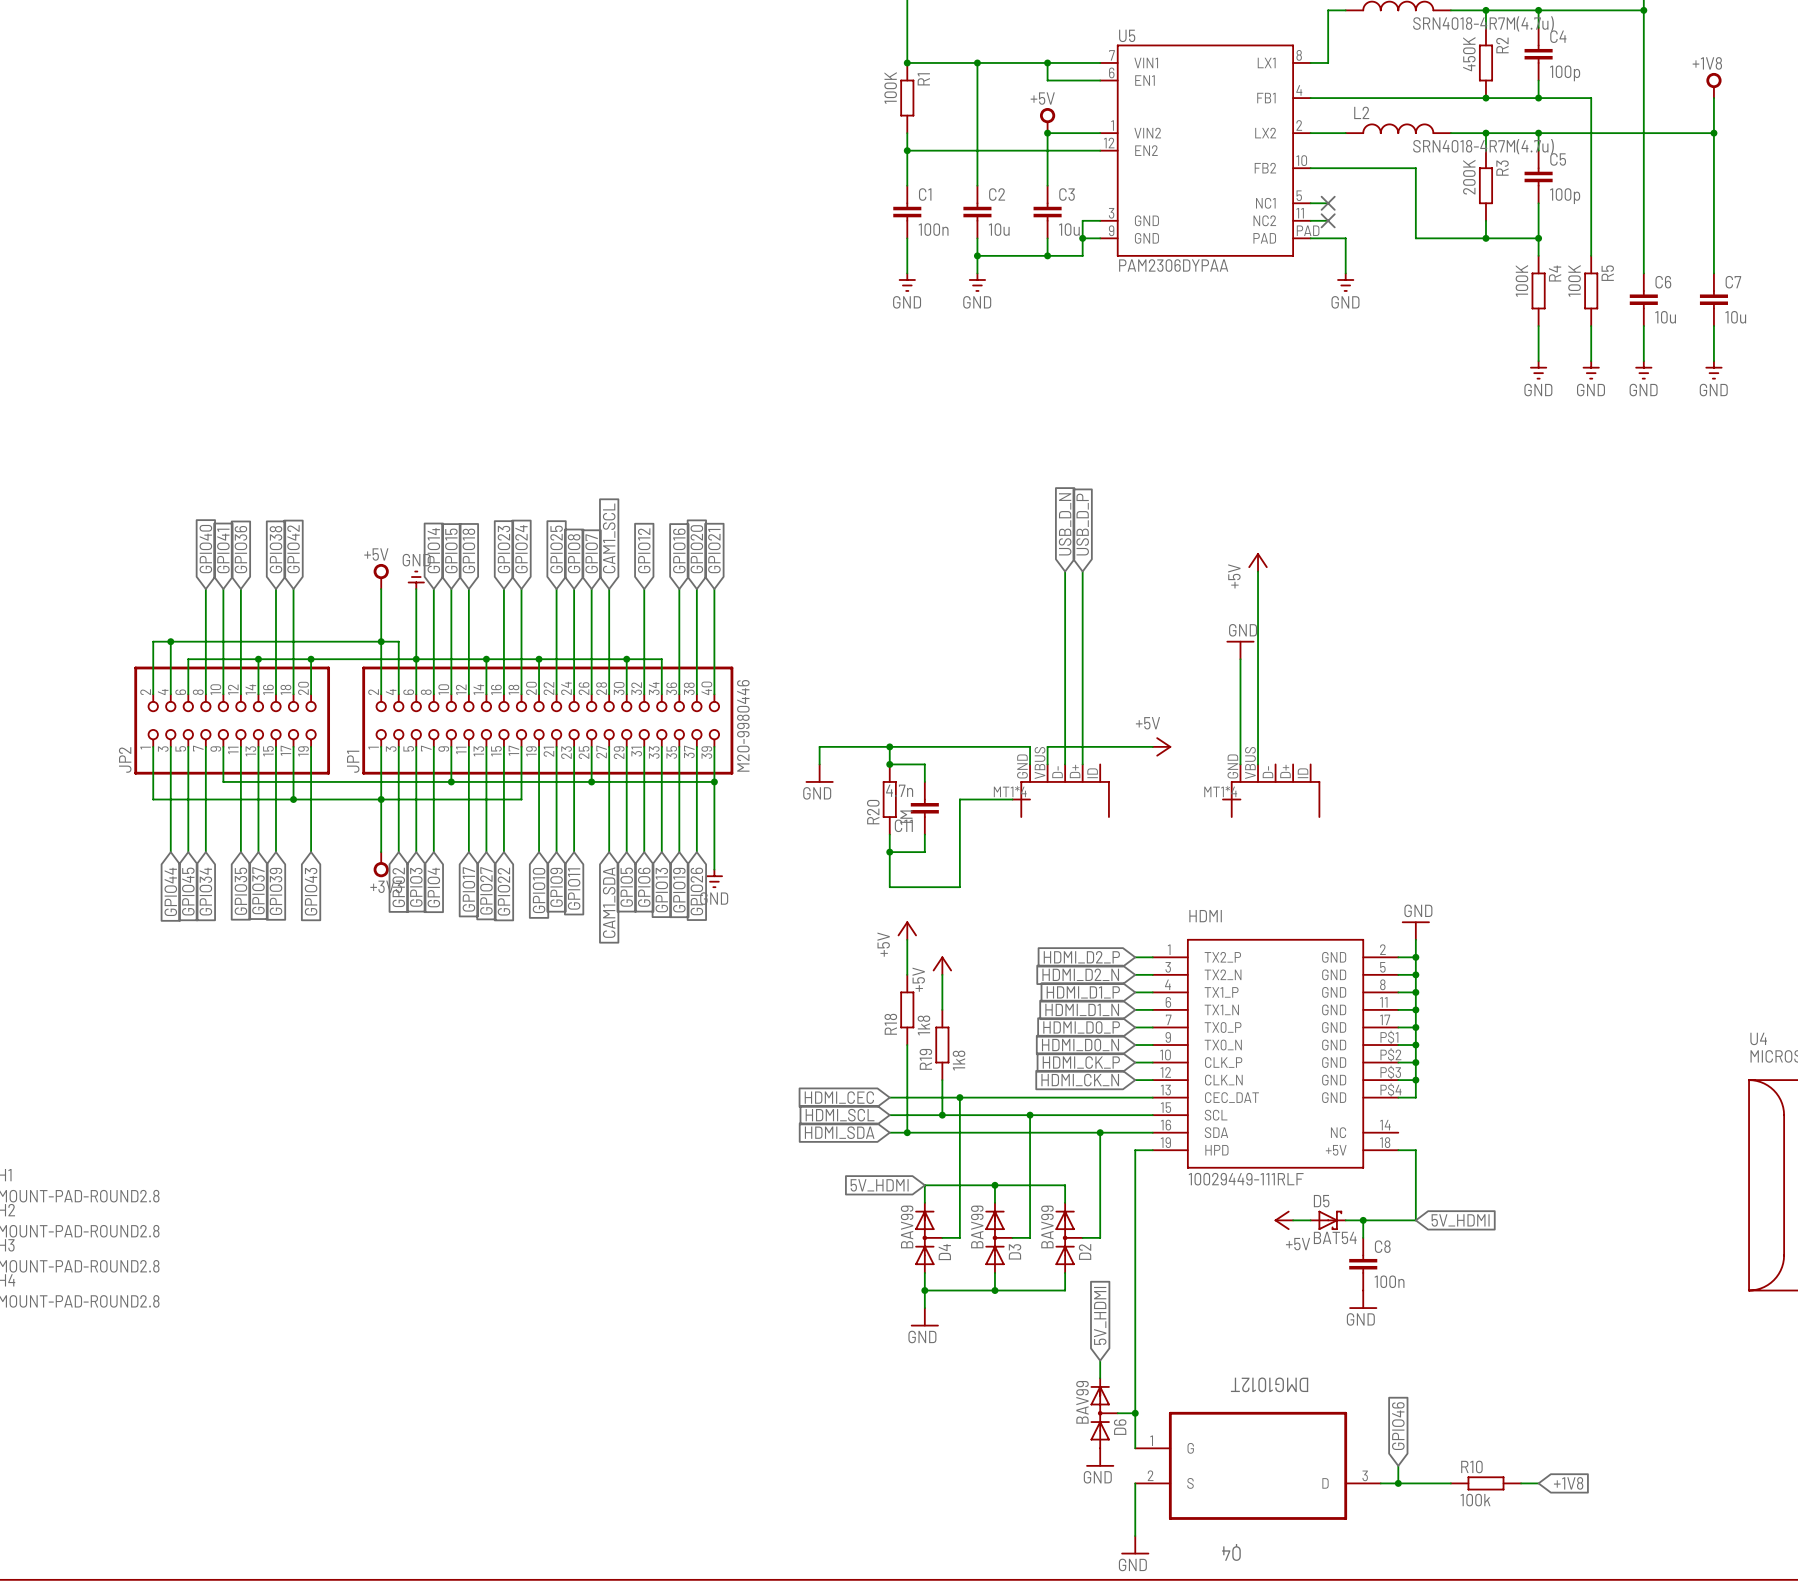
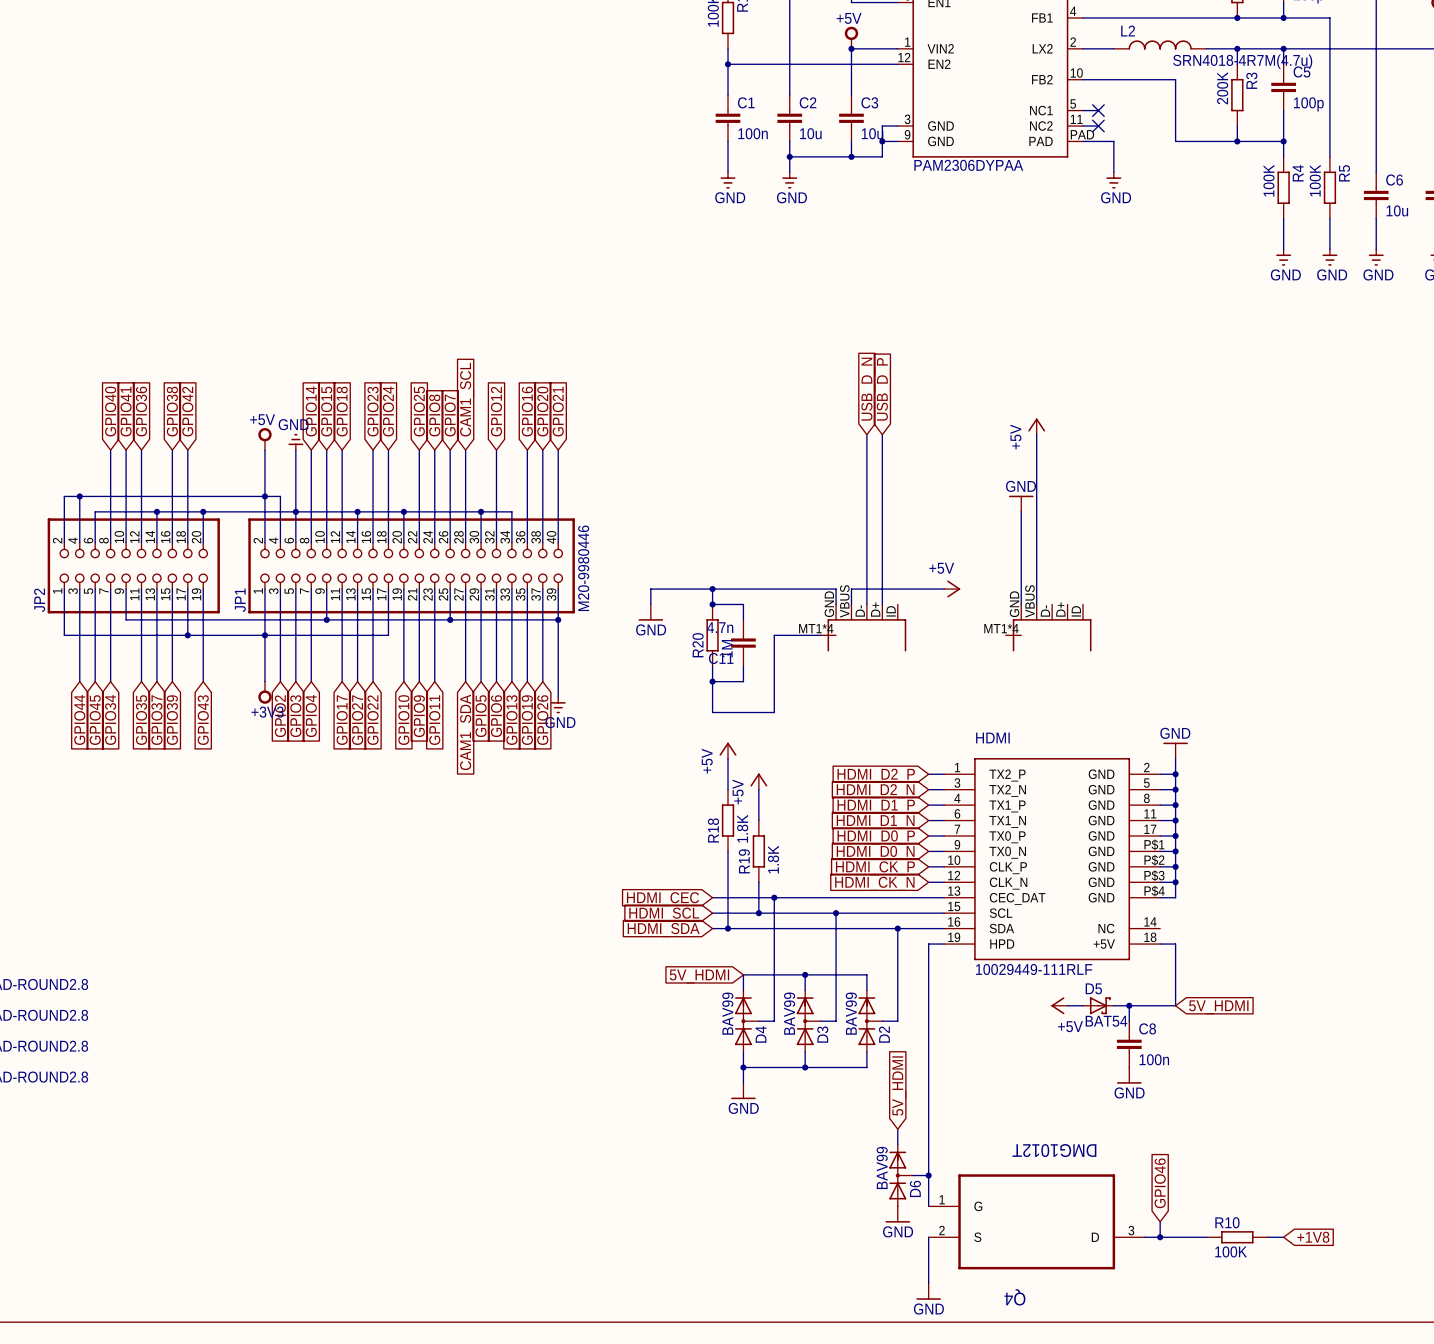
R18 value: 1k8 (923, 1025) -> 1.8K (742, 828)
R19 value: 1k8 (959, 1060) -> 1.8K (773, 859)
R10 value: 100k (1475, 1500) -> 100K (1231, 1251)

